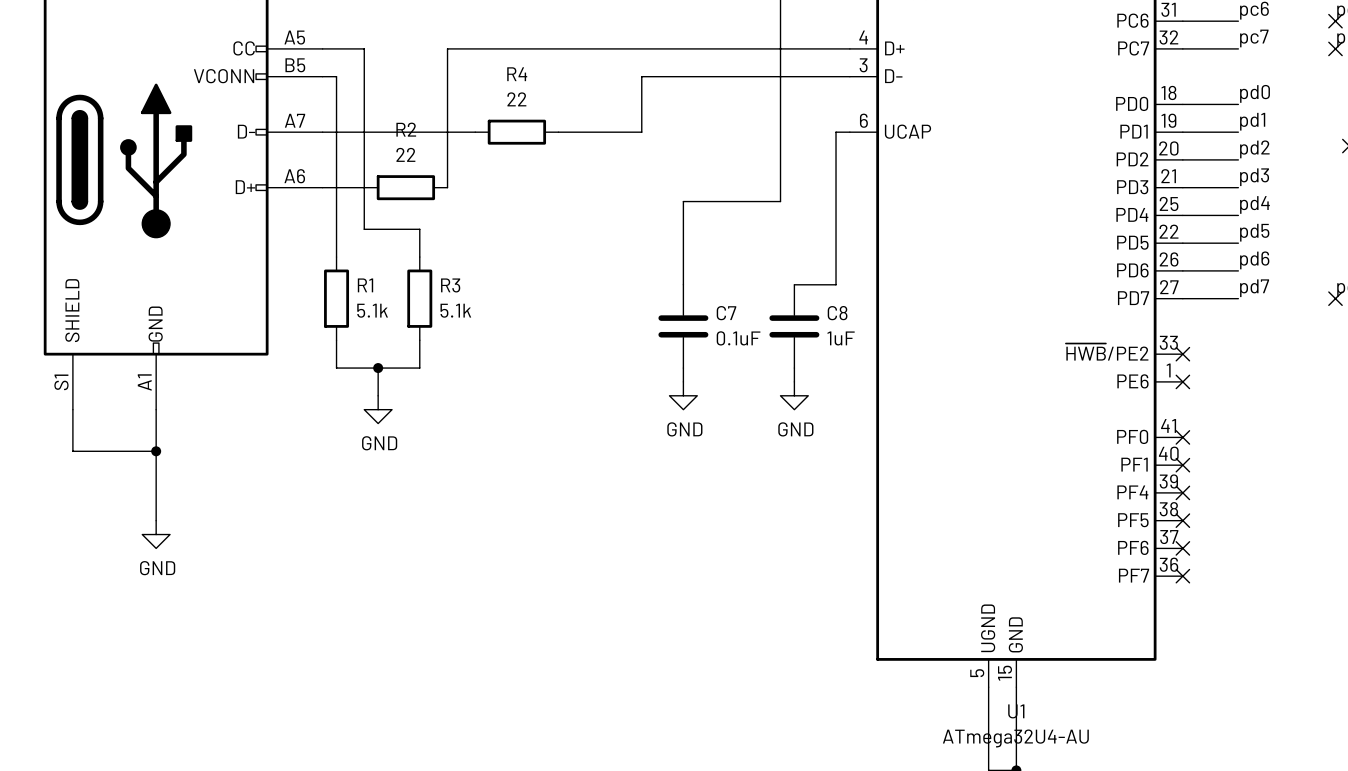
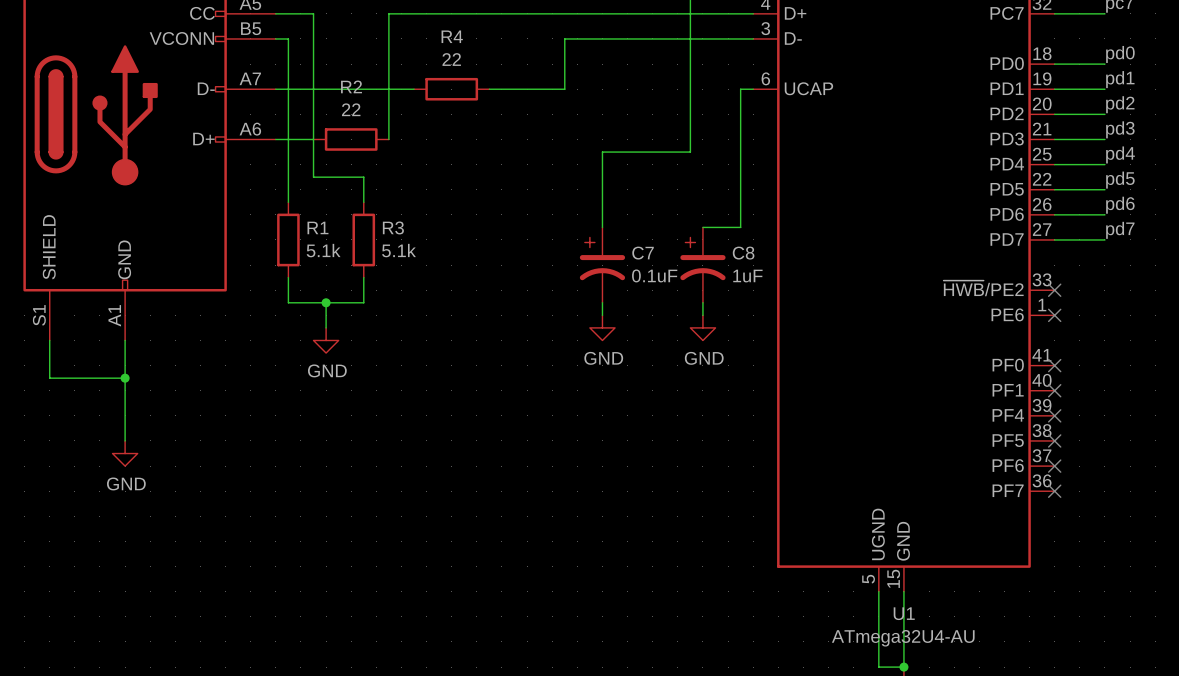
C7 symbol: [658, 284, 709, 369] -> [579, 227, 626, 303]
C8 symbol: [769, 284, 820, 369] -> [680, 227, 726, 303]

